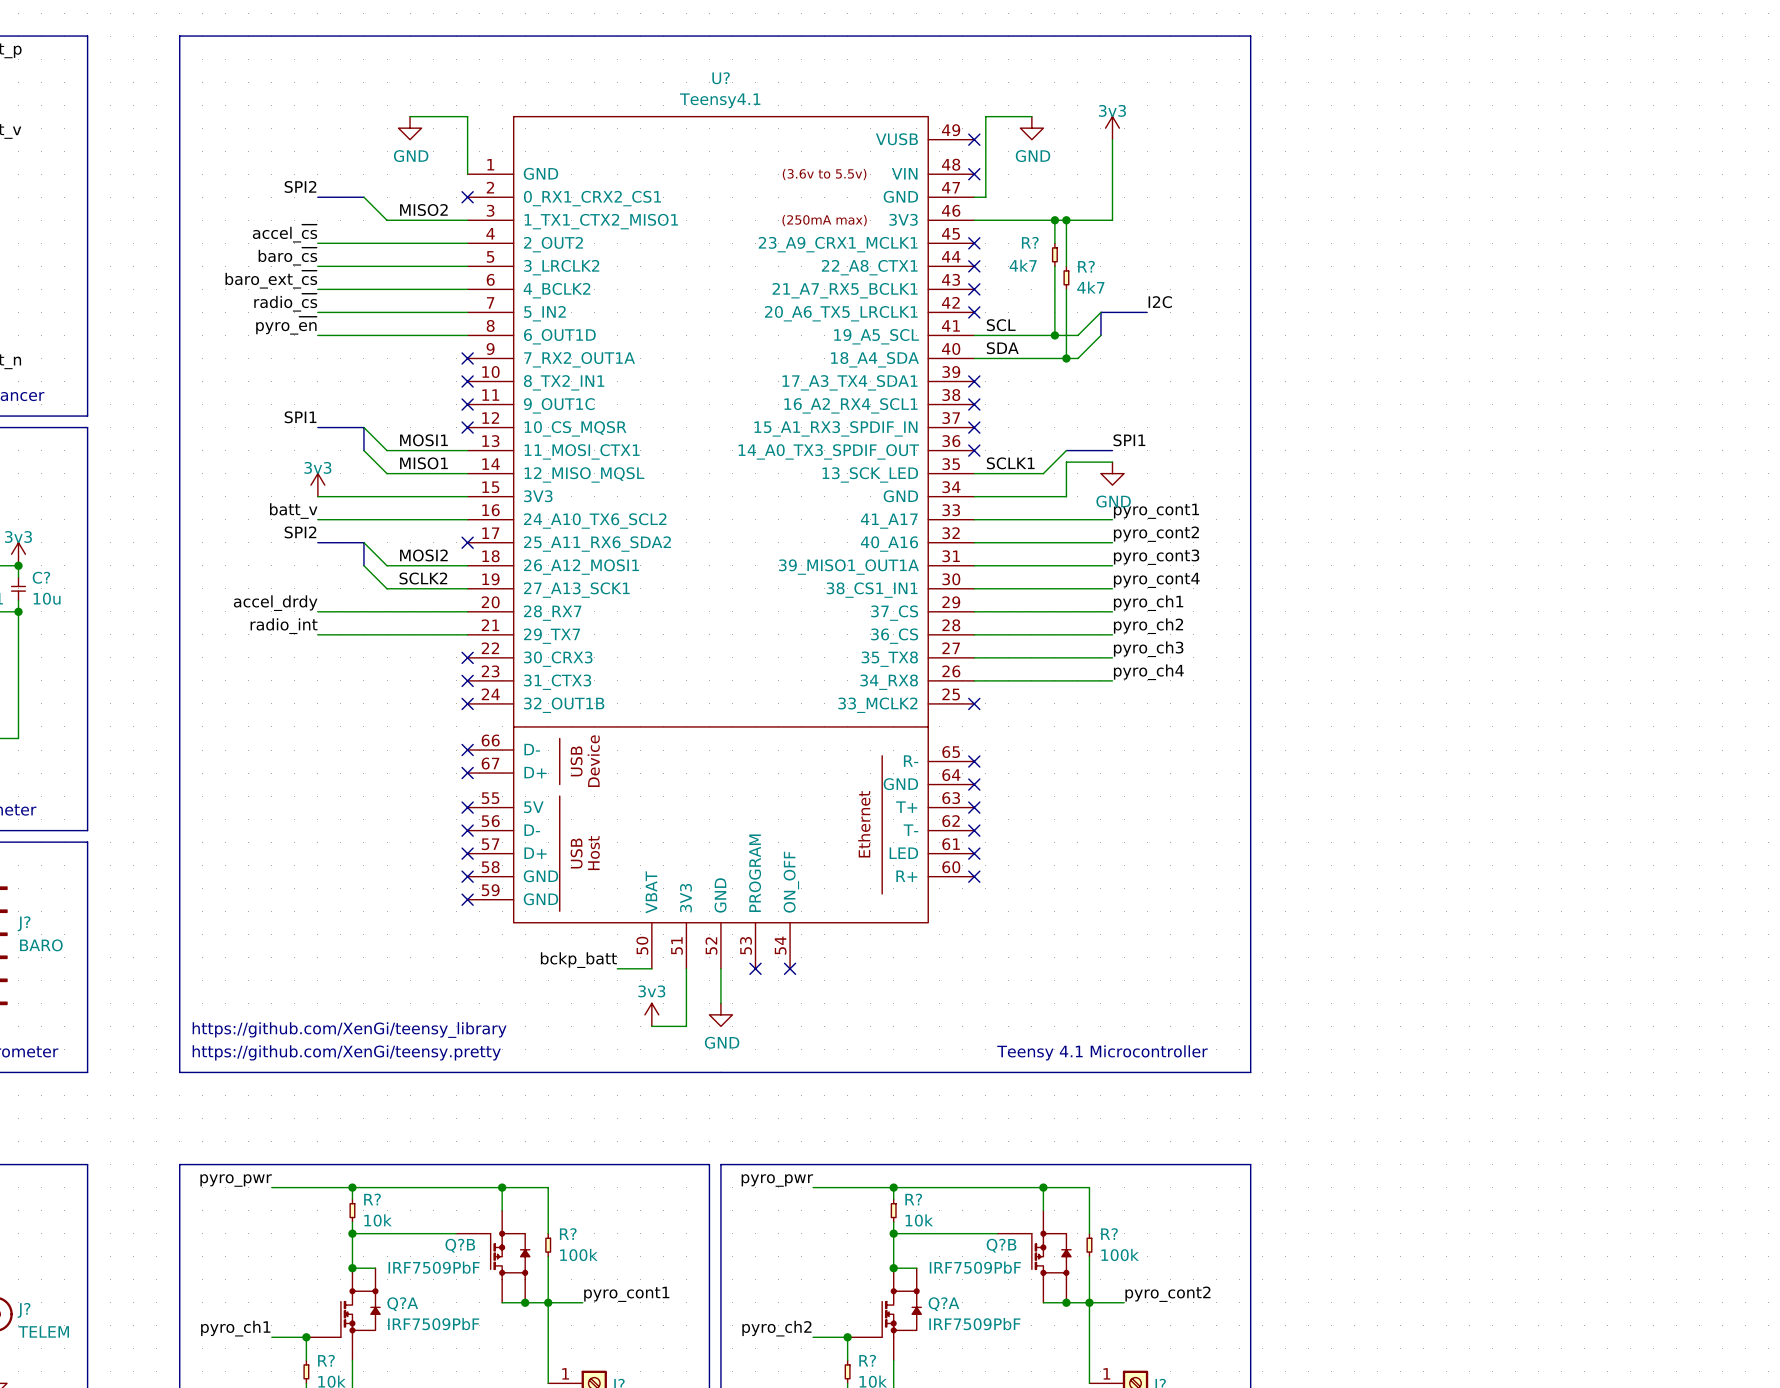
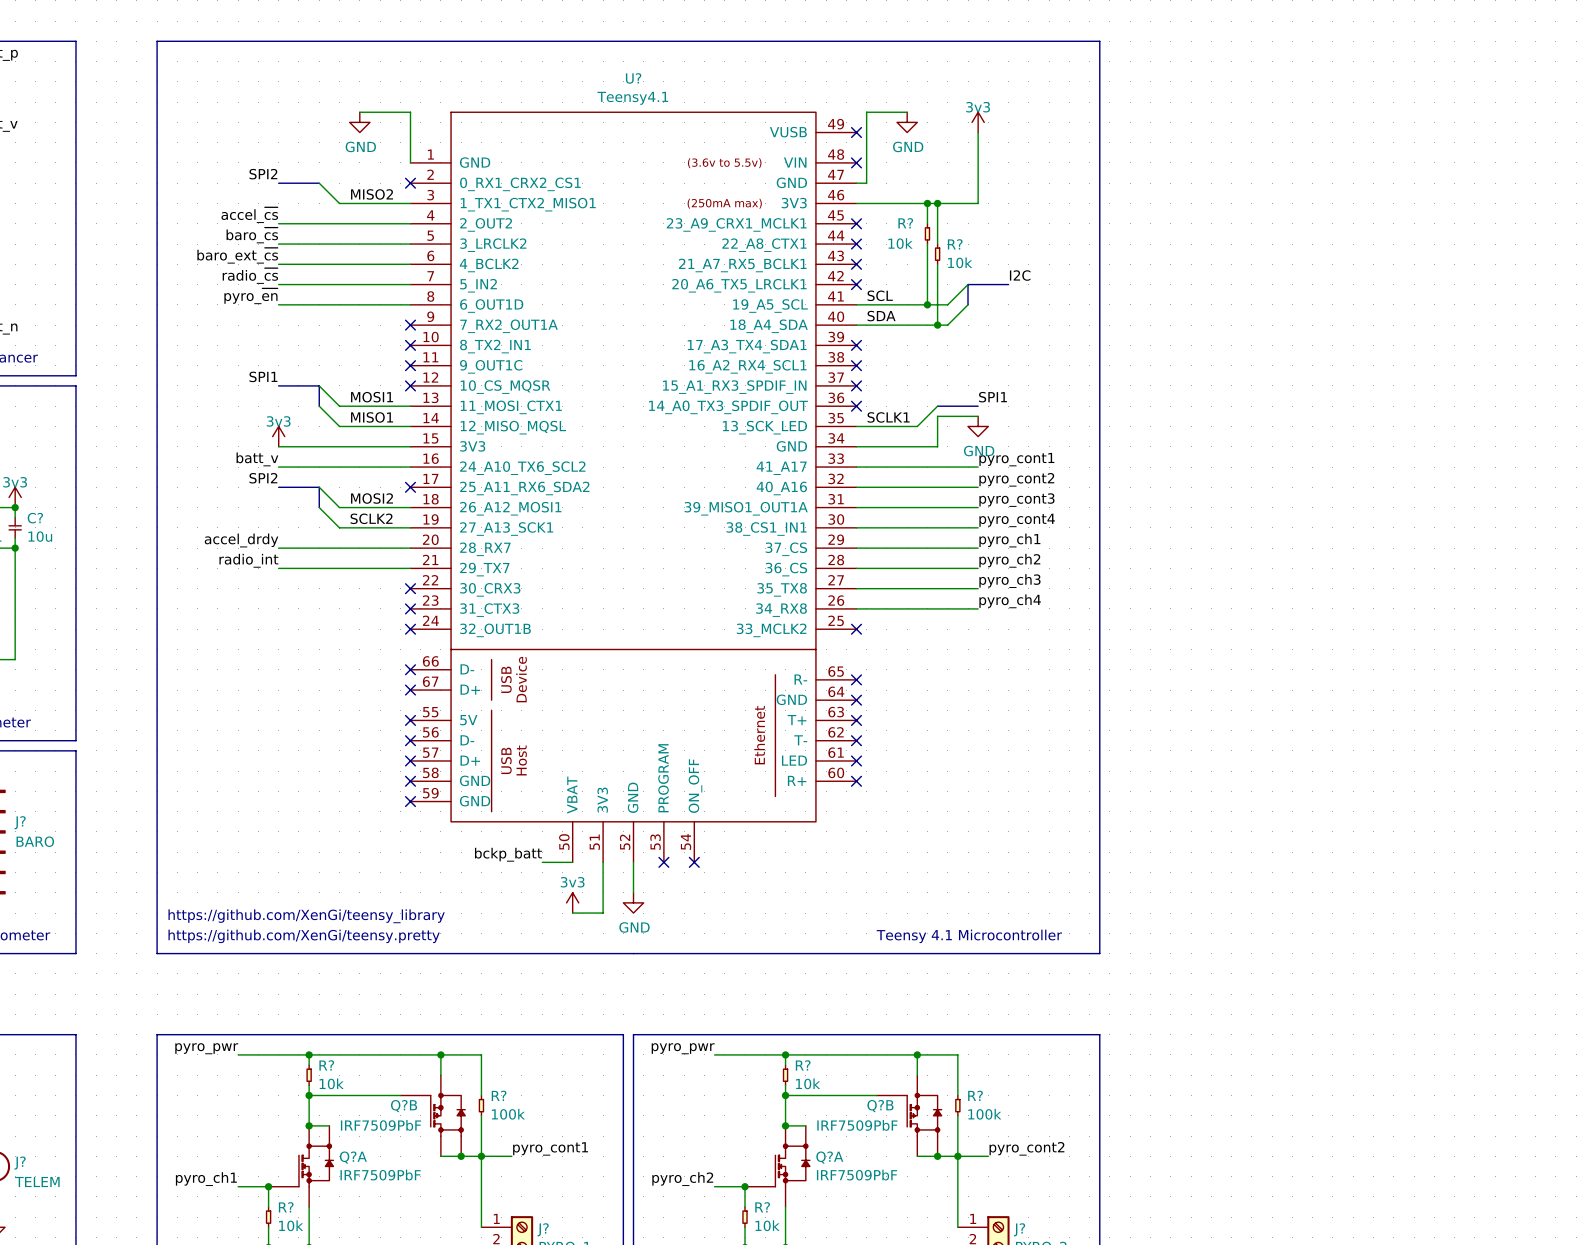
R? value: 4k7 (1023, 265) -> 10k (900, 243)
R? value: 4k7 (1090, 287) -> 10k (960, 262)

